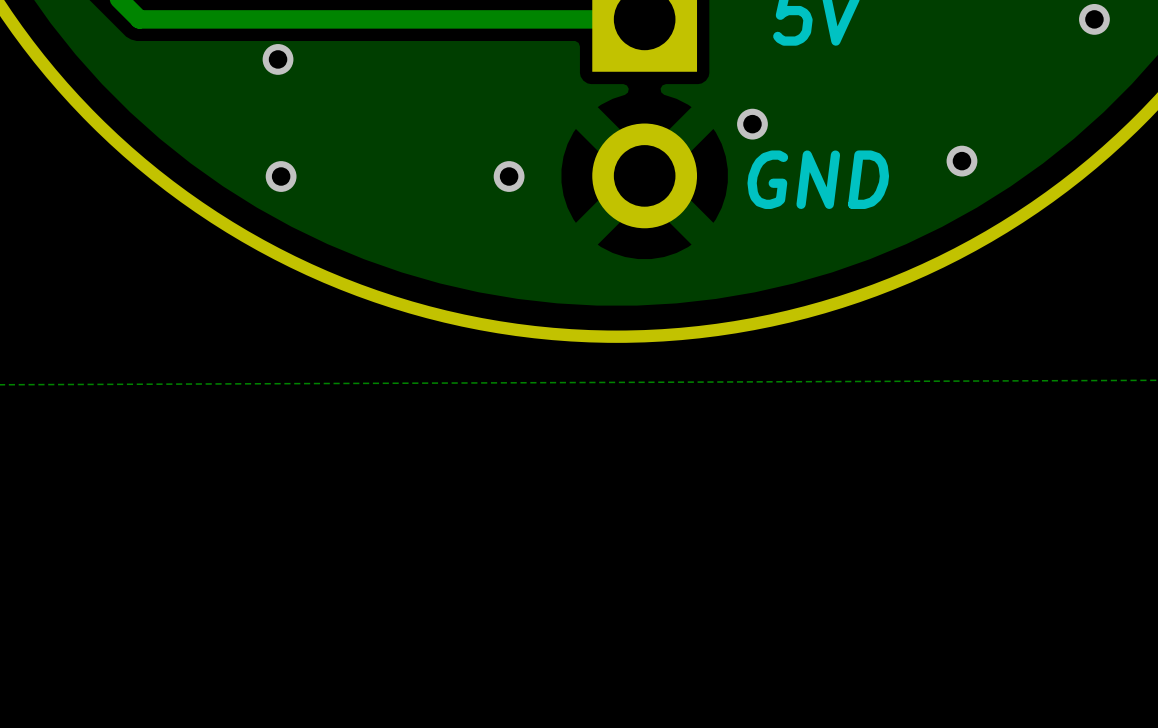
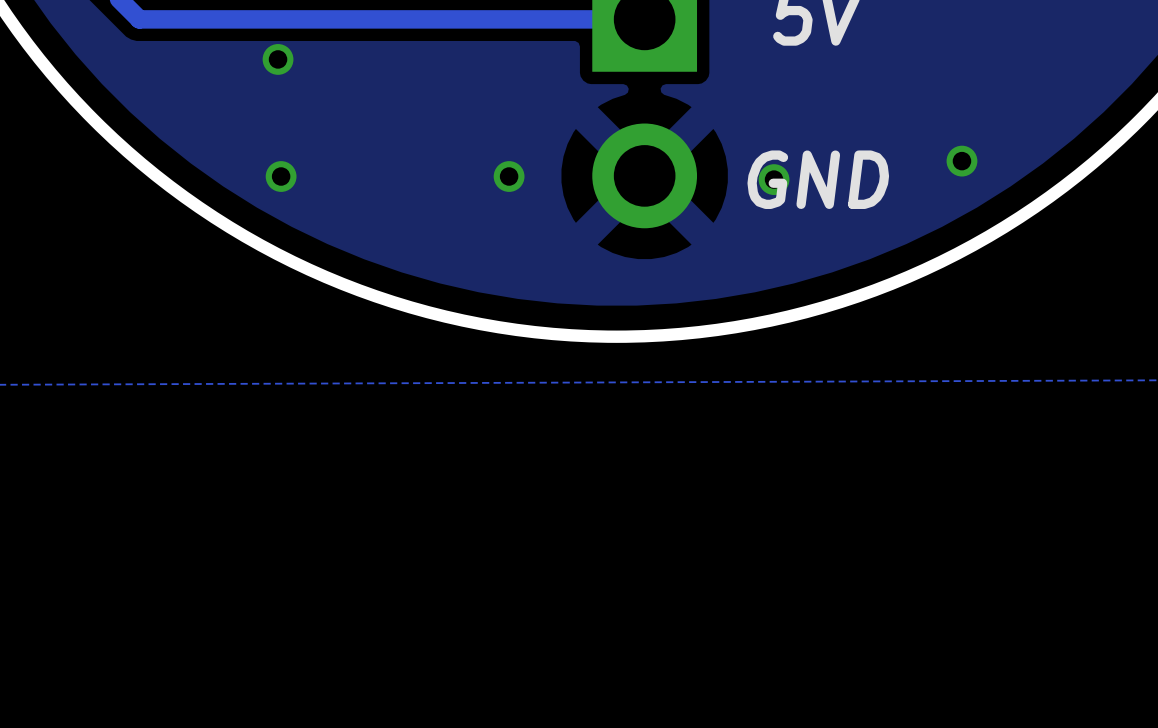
via: (1094, 19) -> none
via position: (752, 124) -> (774, 179)

